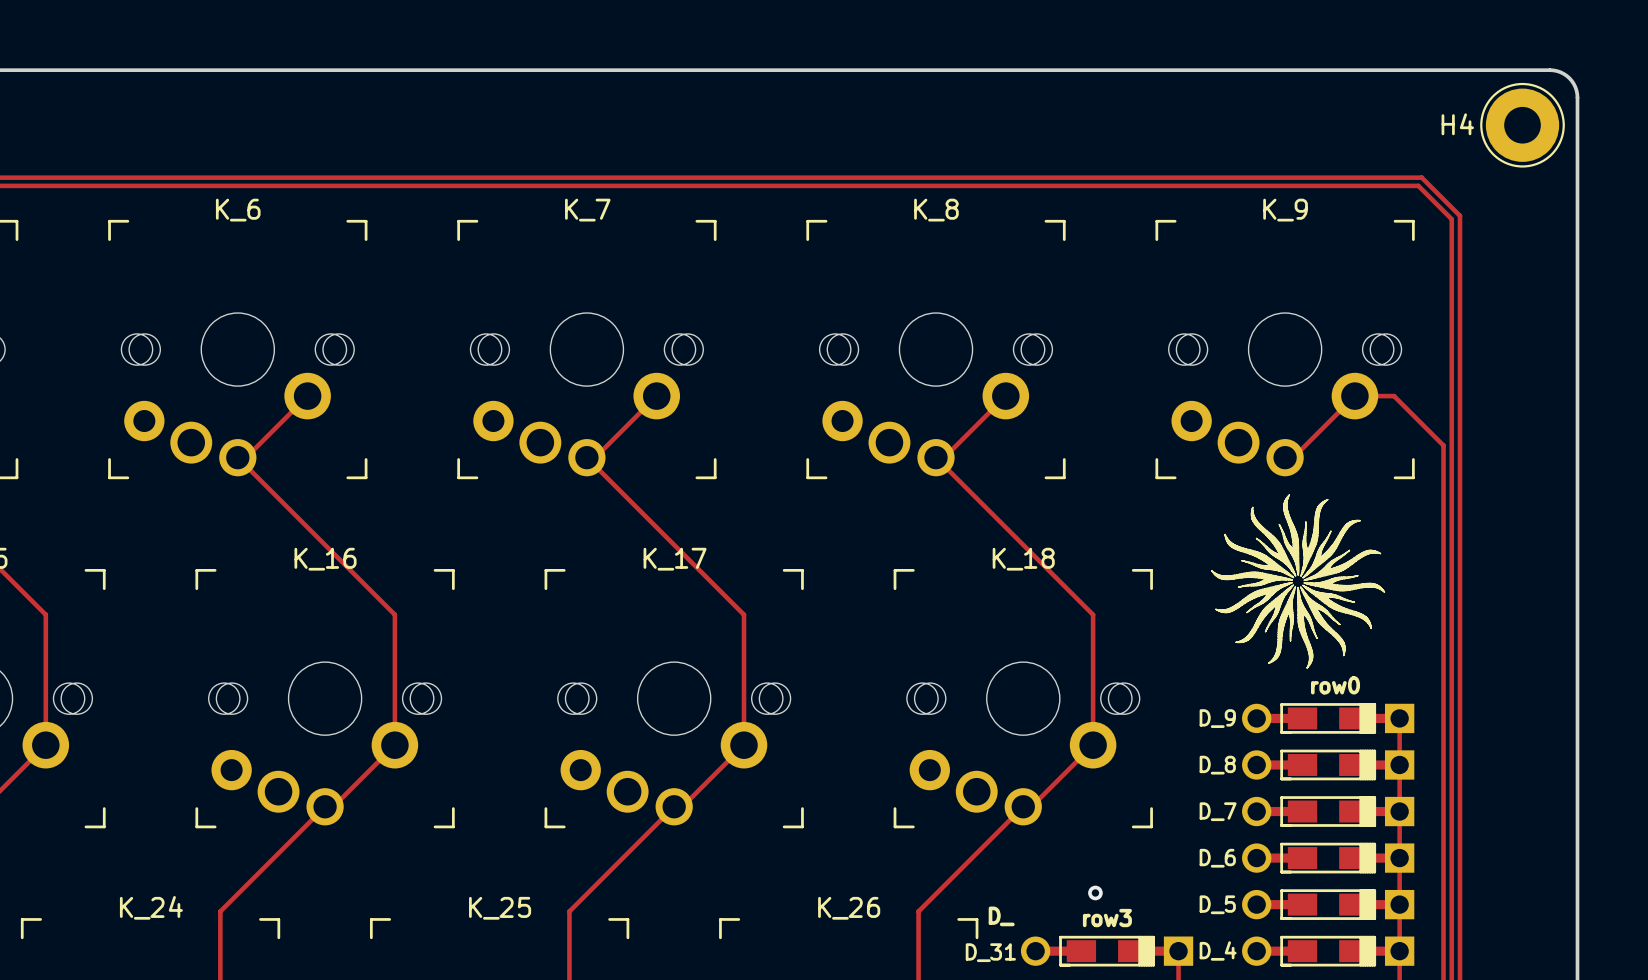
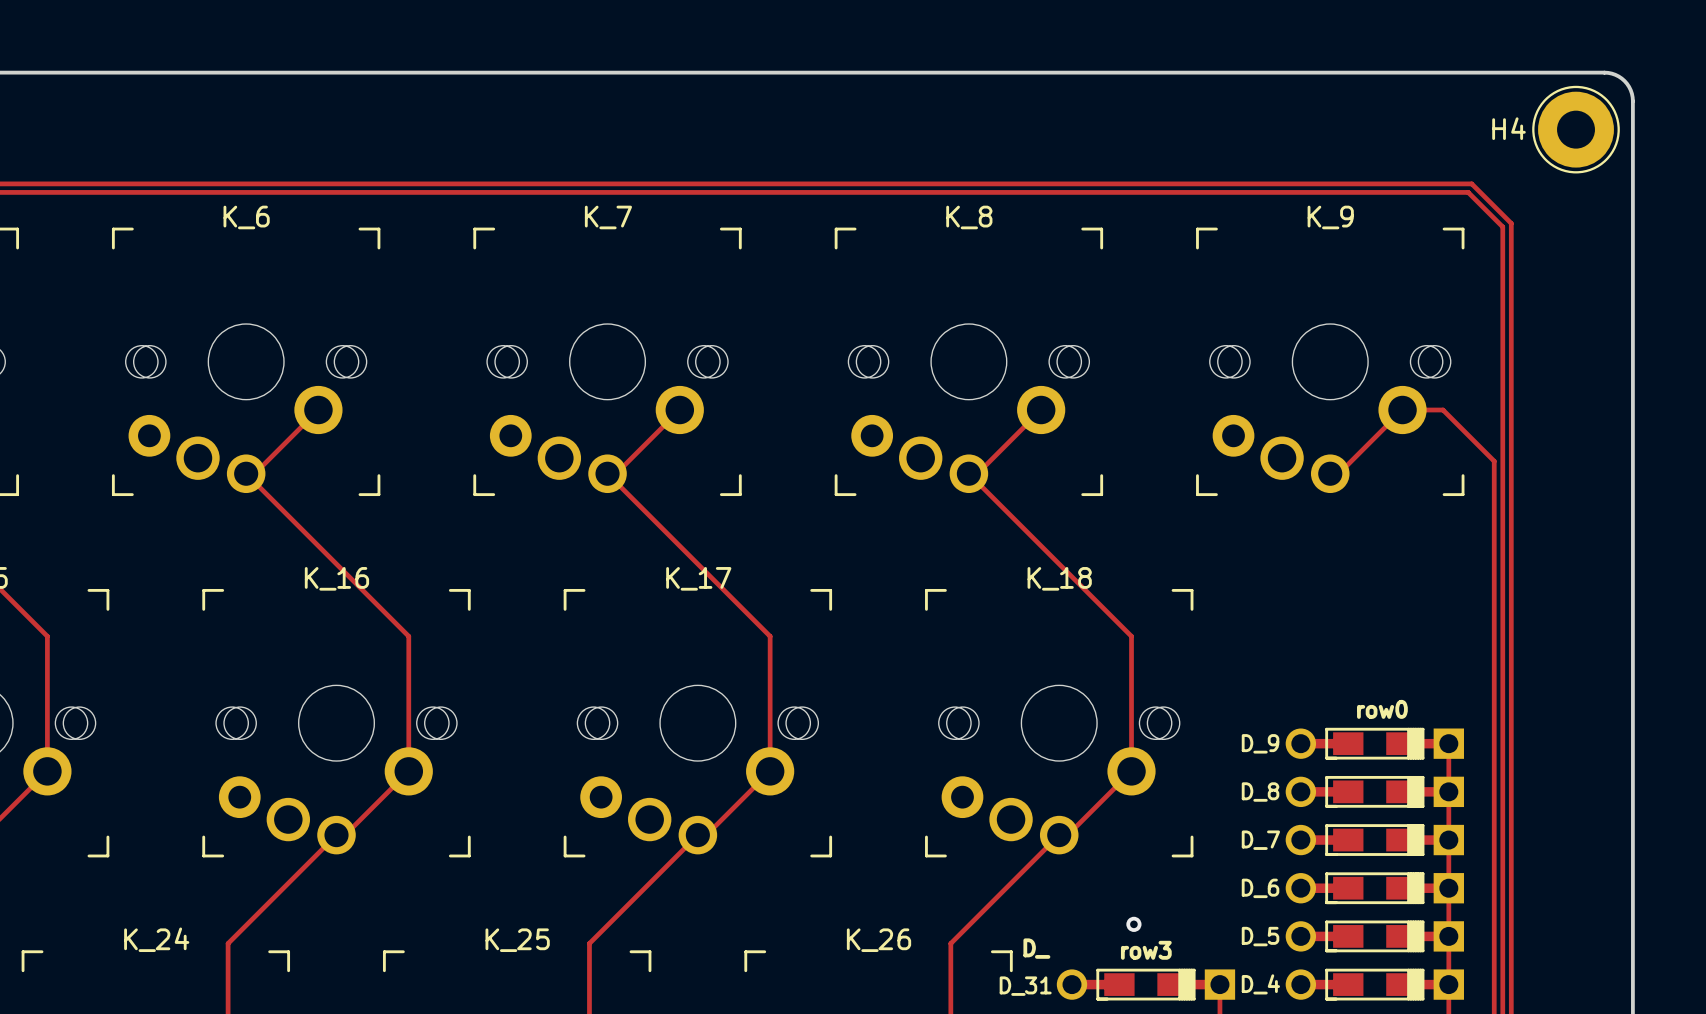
drawing: [1211, 494, 1385, 668] -> none
line: (1289, 494) (1287, 507) (1297, 539) (1298, 575) (1295, 561) (1285, 544) (1279, 524) (1288, 543) (1293, 549) (1291, 532) (1283, 508) (1284, 501) (1289, 495) -> none
line: (1327, 499) (1320, 503) (1316, 509) (1313, 534) (1307, 550) (1305, 542) (1306, 529) (1305, 521) (1303, 543) (1304, 562) (1300, 575) -> none
line: (1327, 499) (1320, 509) (1316, 543) (1301, 575) -> none
line: (1252, 507) (1256, 519) (1279, 543) (1295, 575) (1287, 565) (1271, 553) (1256, 538) (1272, 551) (1279, 554) (1271, 540) (1253, 521) (1251, 515) (1252, 507) -> none
line: (1360, 520) (1352, 521) (1346, 524) (1331, 545) (1320, 557) (1321, 549) (1327, 538) (1330, 531) (1319, 549) (1311, 566) (1303, 577) (1331, 555) (1349, 526) (1360, 520) -> none
line: (1225, 534) (1233, 544) (1265, 555) (1293, 577) (1281, 571) (1261, 568) (1241, 560) (1262, 565) (1269, 565) (1256, 556) (1231, 547) (1227, 542) (1225, 534) -> none
line: (1380, 553) (1373, 550) (1366, 551) (1343, 564) (1328, 569) (1333, 563) (1343, 555) (1349, 550) (1331, 561) (1316, 574) (1304, 580) (1339, 571) (1367, 554) (1380, 553) -> none
line: (1211, 570) (1223, 575) (1257, 572) (1292, 579) (1278, 579) (1259, 585) (1238, 587) (1258, 582) (1265, 578) (1249, 577) (1223, 579) (1217, 576) (1212, 571) -> none
line: (1302, 585) (1315, 591) (1334, 594) (1354, 602) (1334, 597) (1326, 597) (1340, 606) (1364, 615) (1369, 620) (1371, 628) -> none
line: (1303, 585) (1331, 607) (1363, 618) (1371, 628) -> none
line: (1295, 586) (1292, 600) (1293, 619) (1290, 640) (1290, 620) (1288, 612) (1283, 628) (1279, 653) (1275, 659) (1268, 663) -> none
line: (1295, 587) (1280, 619) (1276, 653) (1268, 663) -> none
line: (1384, 591) (1379, 586) (1372, 583) (1347, 585) (1330, 584) (1337, 580) (1350, 577) (1357, 575) (1336, 577) (1318, 583) (1304, 582) (1339, 590) (1372, 587) (1384, 592) -> none
line: (1215, 609) (1228, 608) (1257, 591) (1292, 582) (1279, 588) (1265, 601) (1246, 612) (1263, 599) (1267, 593) (1252, 598) (1229, 611) (1223, 612) (1216, 609) -> none
line: (1236, 642) (1247, 636) (1265, 607) (1293, 585) (1284, 595) (1277, 613) (1265, 631) (1274, 613) (1275, 605) (1264, 617) (1249, 638) (1244, 641) (1236, 642) -> none
line: (1343, 655) (1344, 647) (1343, 641) (1325, 622) (1316, 608) (1323, 611) (1333, 620) (1339, 624) (1325, 609) (1309, 597) (1300, 587) (1316, 619) (1340, 643) (1343, 655) -> none
line: (1307, 667) (1309, 655) (1298, 623) (1298, 587) (1301, 601) (1310, 618) (1317, 638) (1308, 619) (1303, 613) (1305, 629) (1312, 654) (1311, 661) (1307, 667) -> none

